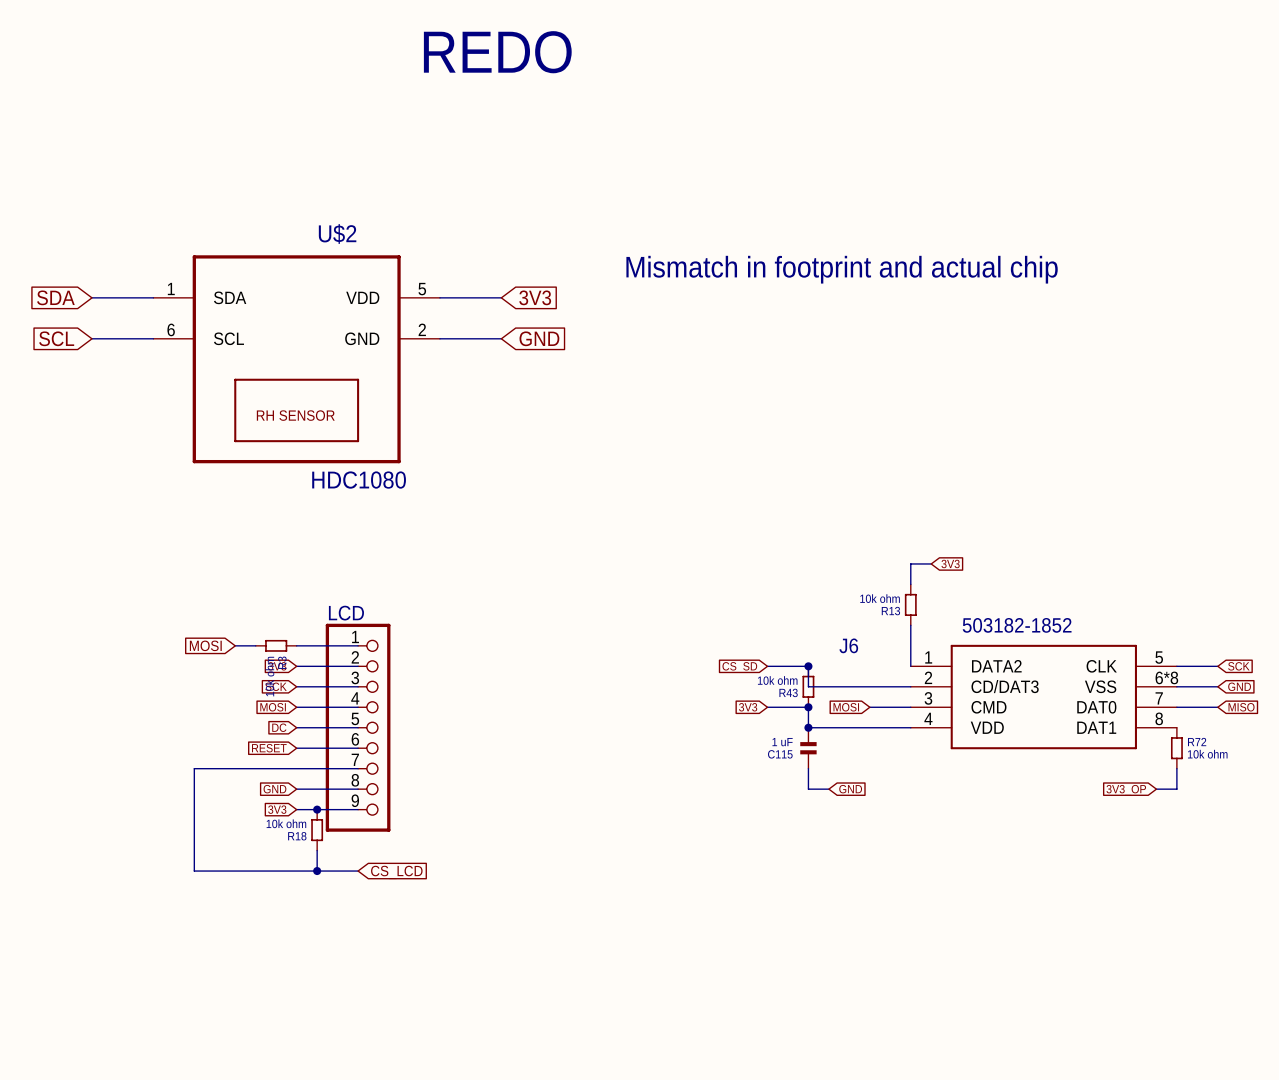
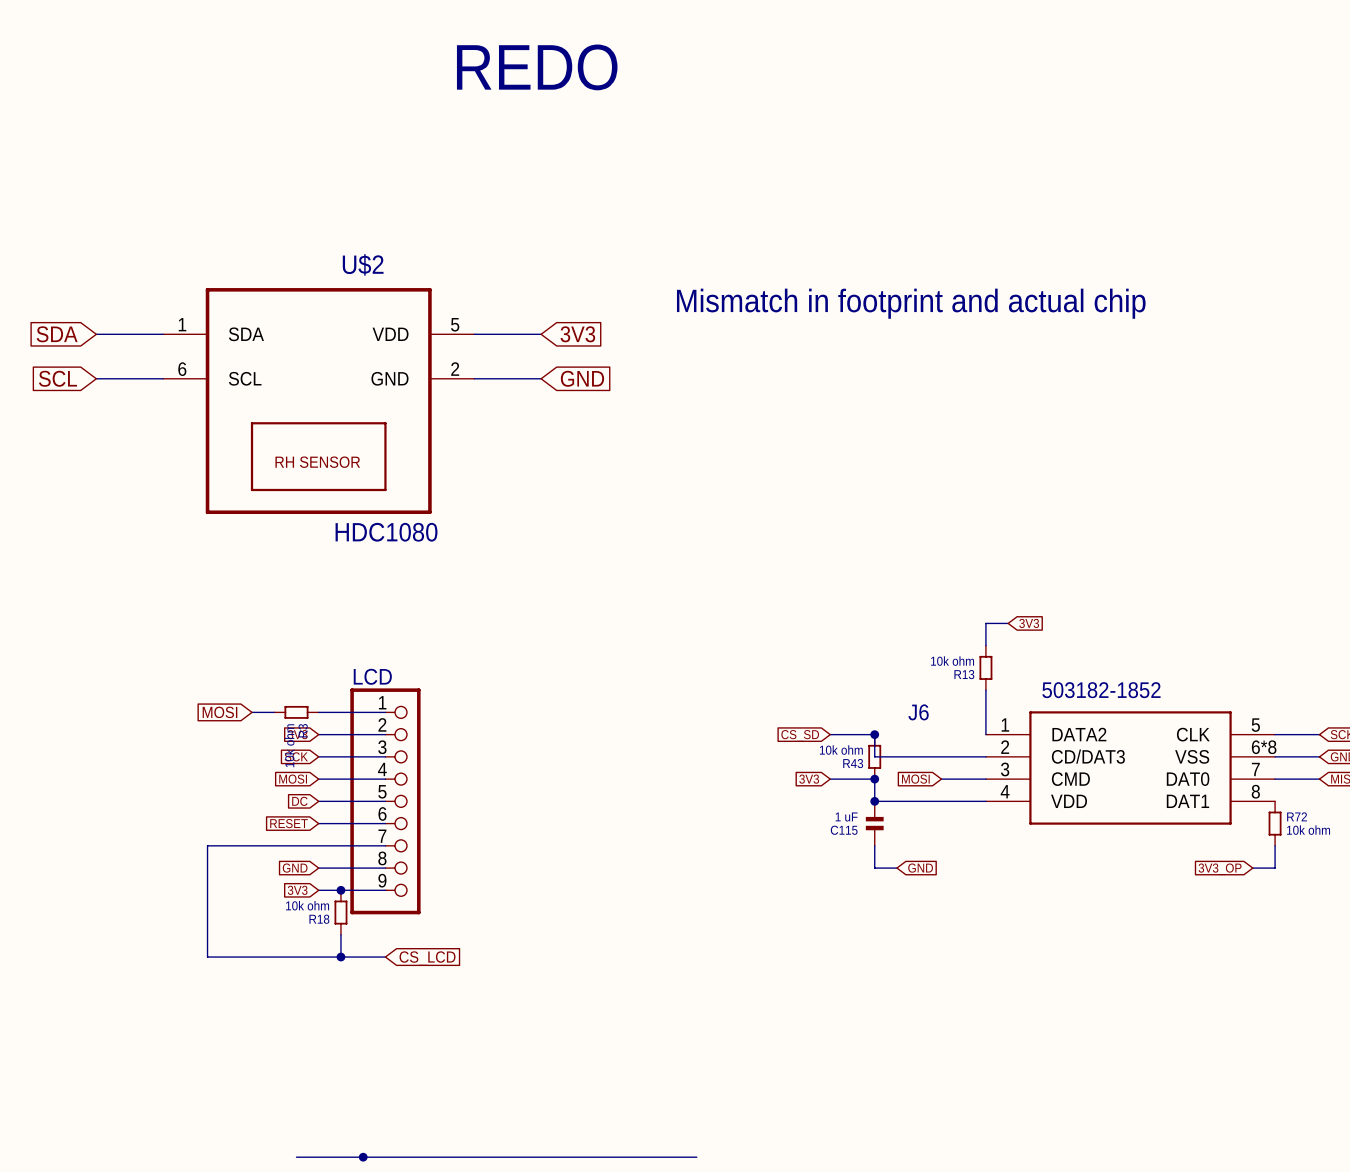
wire: none -> (296, 1157) (696, 1157)
junction: none -> (363, 1157)

